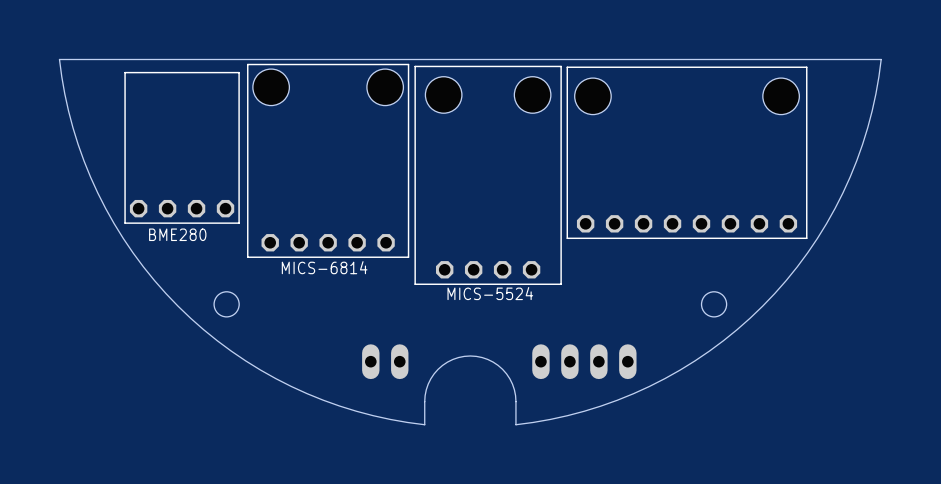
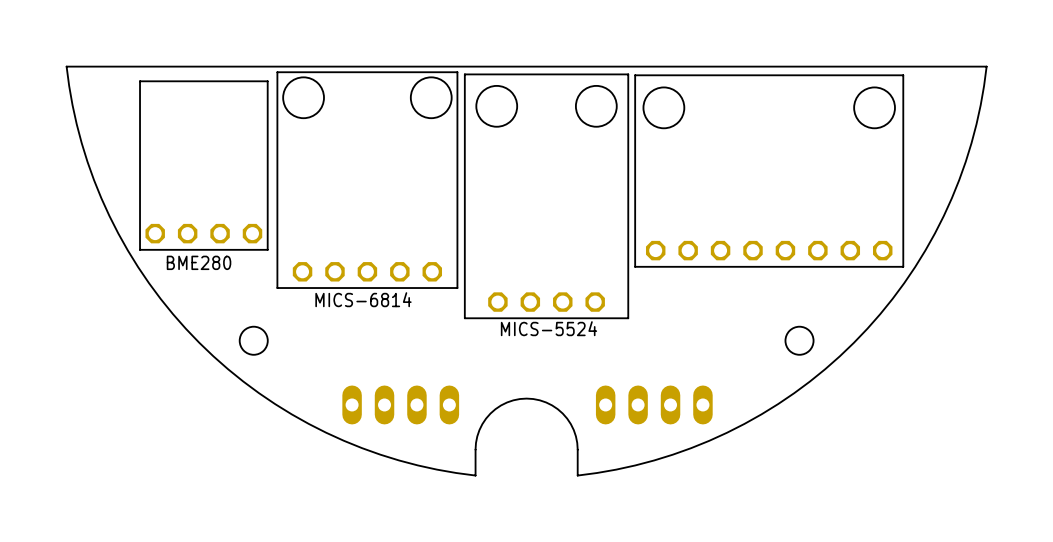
part: none -> (400, 404)
part: (385, 361) -> none

